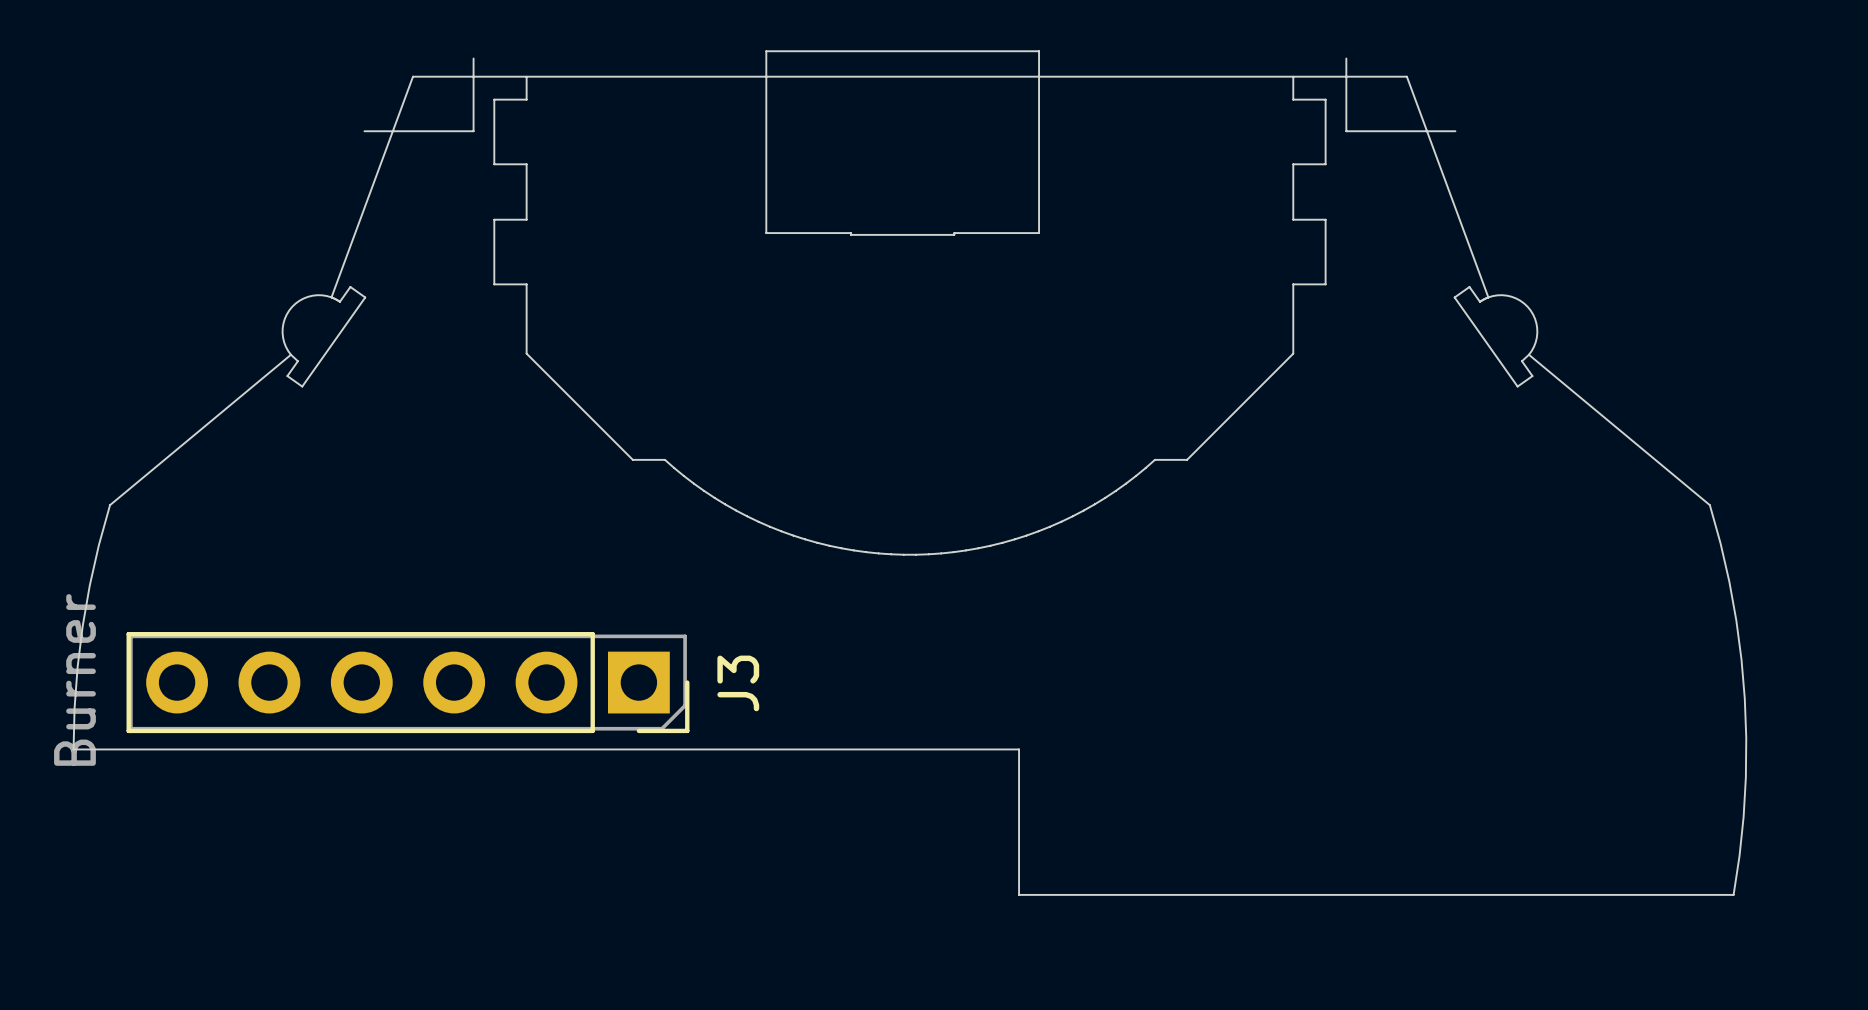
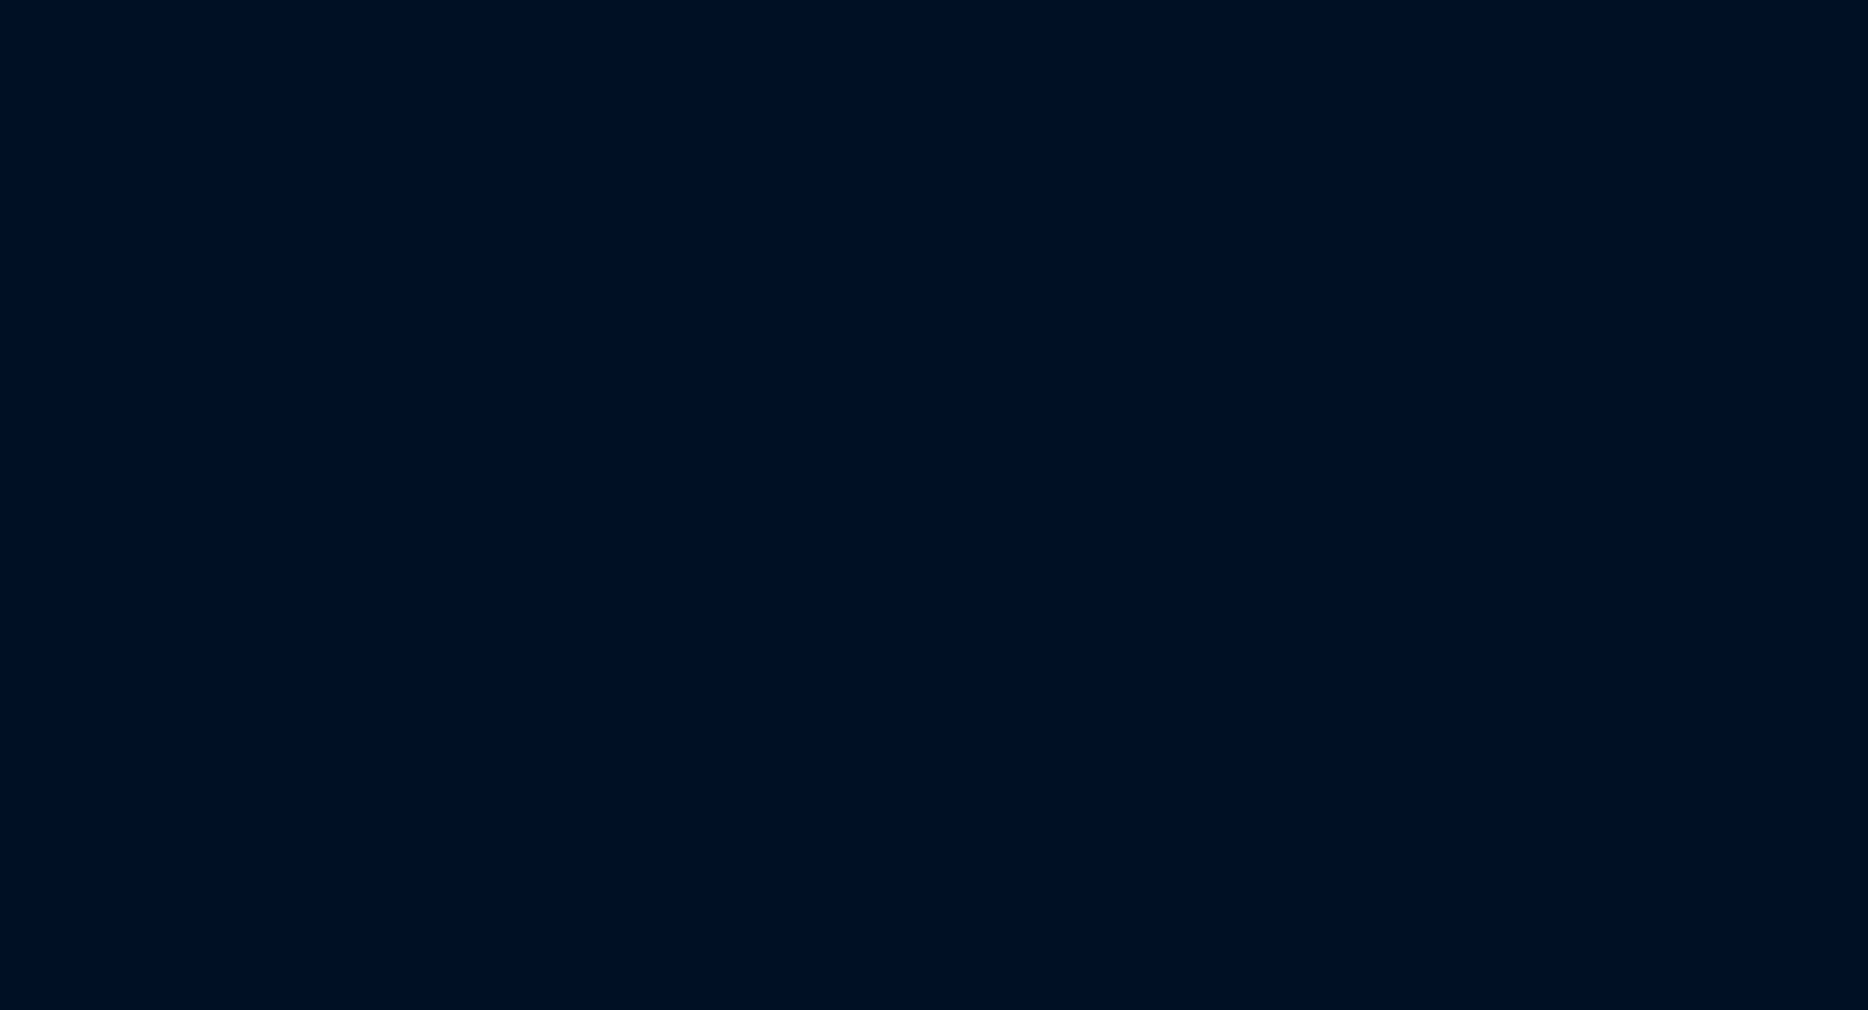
board edge: (766, 51) (1039, 51) (1039, 233) (954, 233) (954, 234) (766, 233) (766, 51) -> none
board edge: (473, 58) (473, 131) (364, 131) -> none
board edge: (1346, 58) (1346, 131) (1455, 131) -> none
board edge: (526, 76) (526, 99) (494, 99) (494, 164) (526, 164) (526, 219) (494, 219) (494, 284) (526, 284) (526, 353) (632, 459) (664, 459) (693, 483) (725, 504) (758, 521) (793, 535) (853, 550) (903, 554) (965, 550) (1026, 535) (1061, 521) (1094, 504) (1125, 483) (1154, 459) (1187, 459) (1293, 353) (1293, 284) (1325, 284) (1325, 219) (1293, 219) (1293, 164) (1325, 164) (1325, 99) (1293, 99) (1293, 76) -> none
board edge: (331, 297) (413, 76) (1406, 76) (1488, 297) -> none
board edge: (331, 297) (339, 301) (350, 286) (365, 297) (302, 386) (287, 376) (297, 361) (290, 354) -> none
board edge: (331, 297) (317, 295) (308, 296) (295, 303) (289, 310) (283, 323) (282, 332) (285, 346) (290, 354) -> none
board edge: (1488, 297) (1479, 301) (1469, 286) (1454, 297) (1517, 386) (1532, 376) (1521, 361) (1528, 354) -> none
board edge: (1488, 297) (1502, 295) (1511, 296) (1524, 303) (1530, 310) (1535, 318) (1537, 332) (1535, 342) (1528, 354) -> none
board edge: (290, 354) (110, 505) (98, 544) (82, 625) (77, 666) (73, 749) (1019, 749) (1019, 894) (1733, 894) (1743, 816) (1745, 777) (1744, 698) (1741, 659) (1729, 581) (1709, 505) (1528, 354) -> none
J3: Burner (407, 682) -> none

